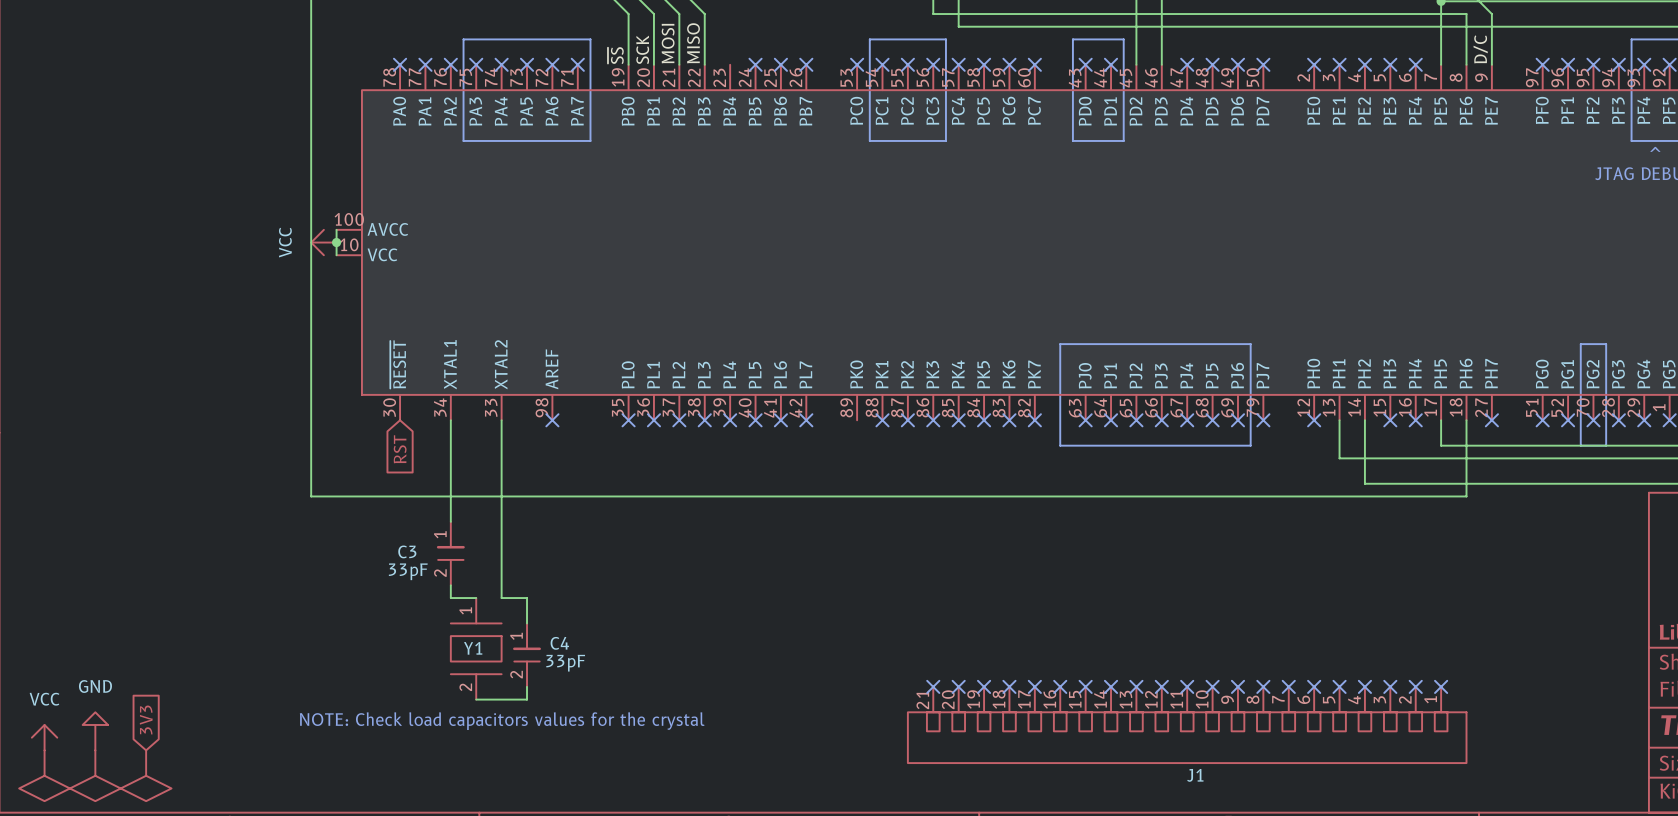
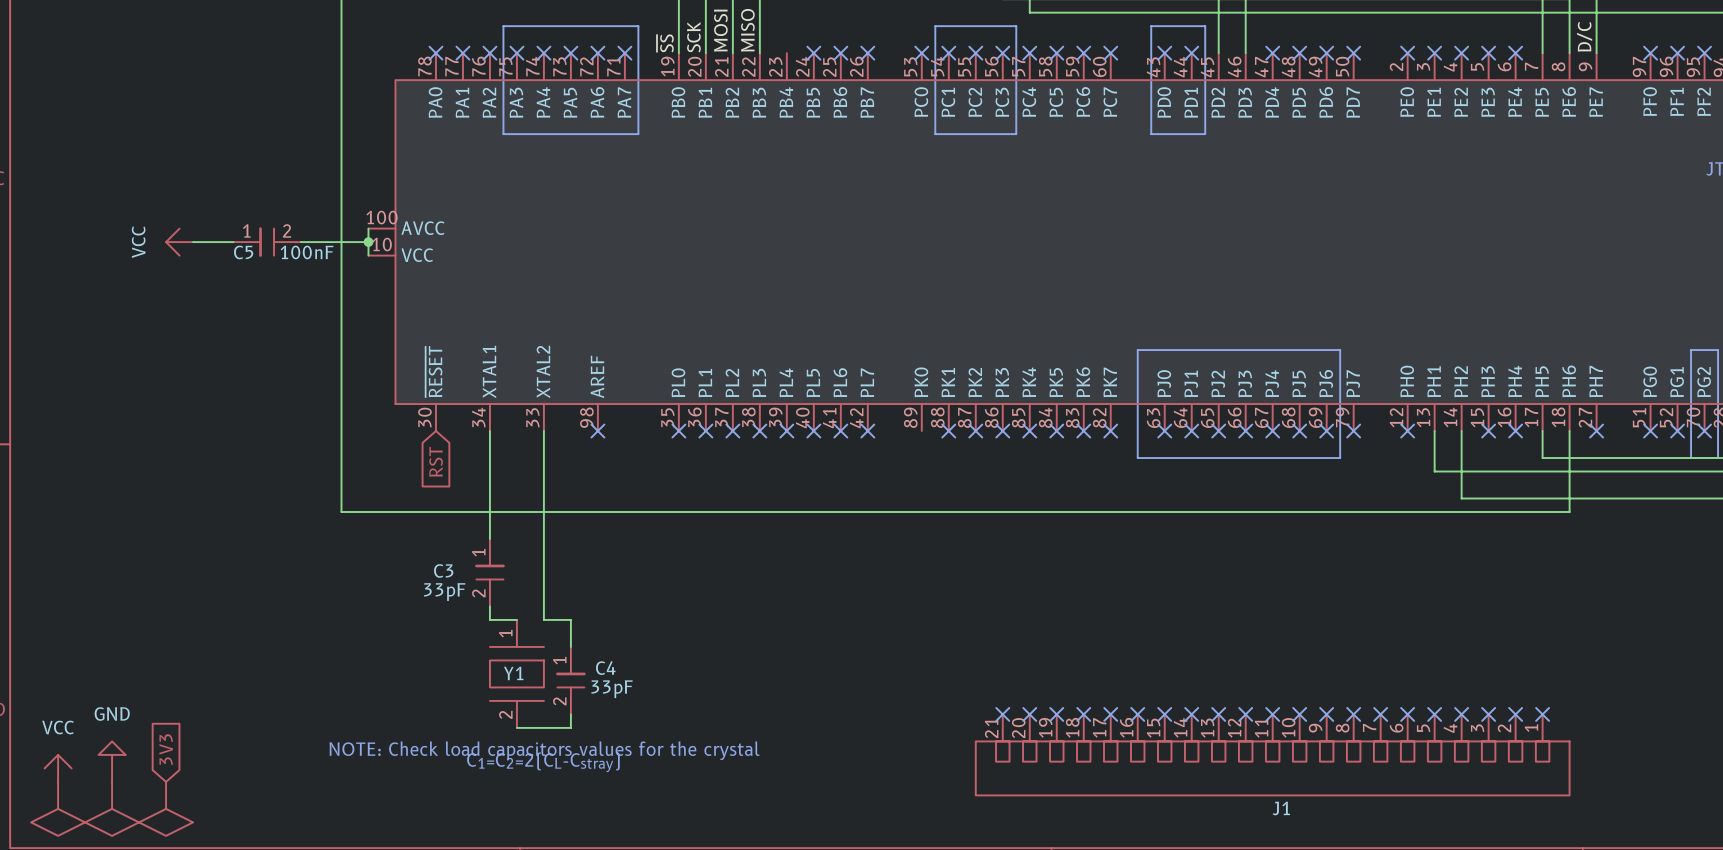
wire: none -> (193, 242) (233, 242)
C5: none -> 100nF (267, 242)
wire: none -> (301, 242) (368, 242)
power symbol position: VCC (323, 242) -> VCC (179, 242)
text: none -> C1=C2=2(CL-Cstray) (543, 762)

